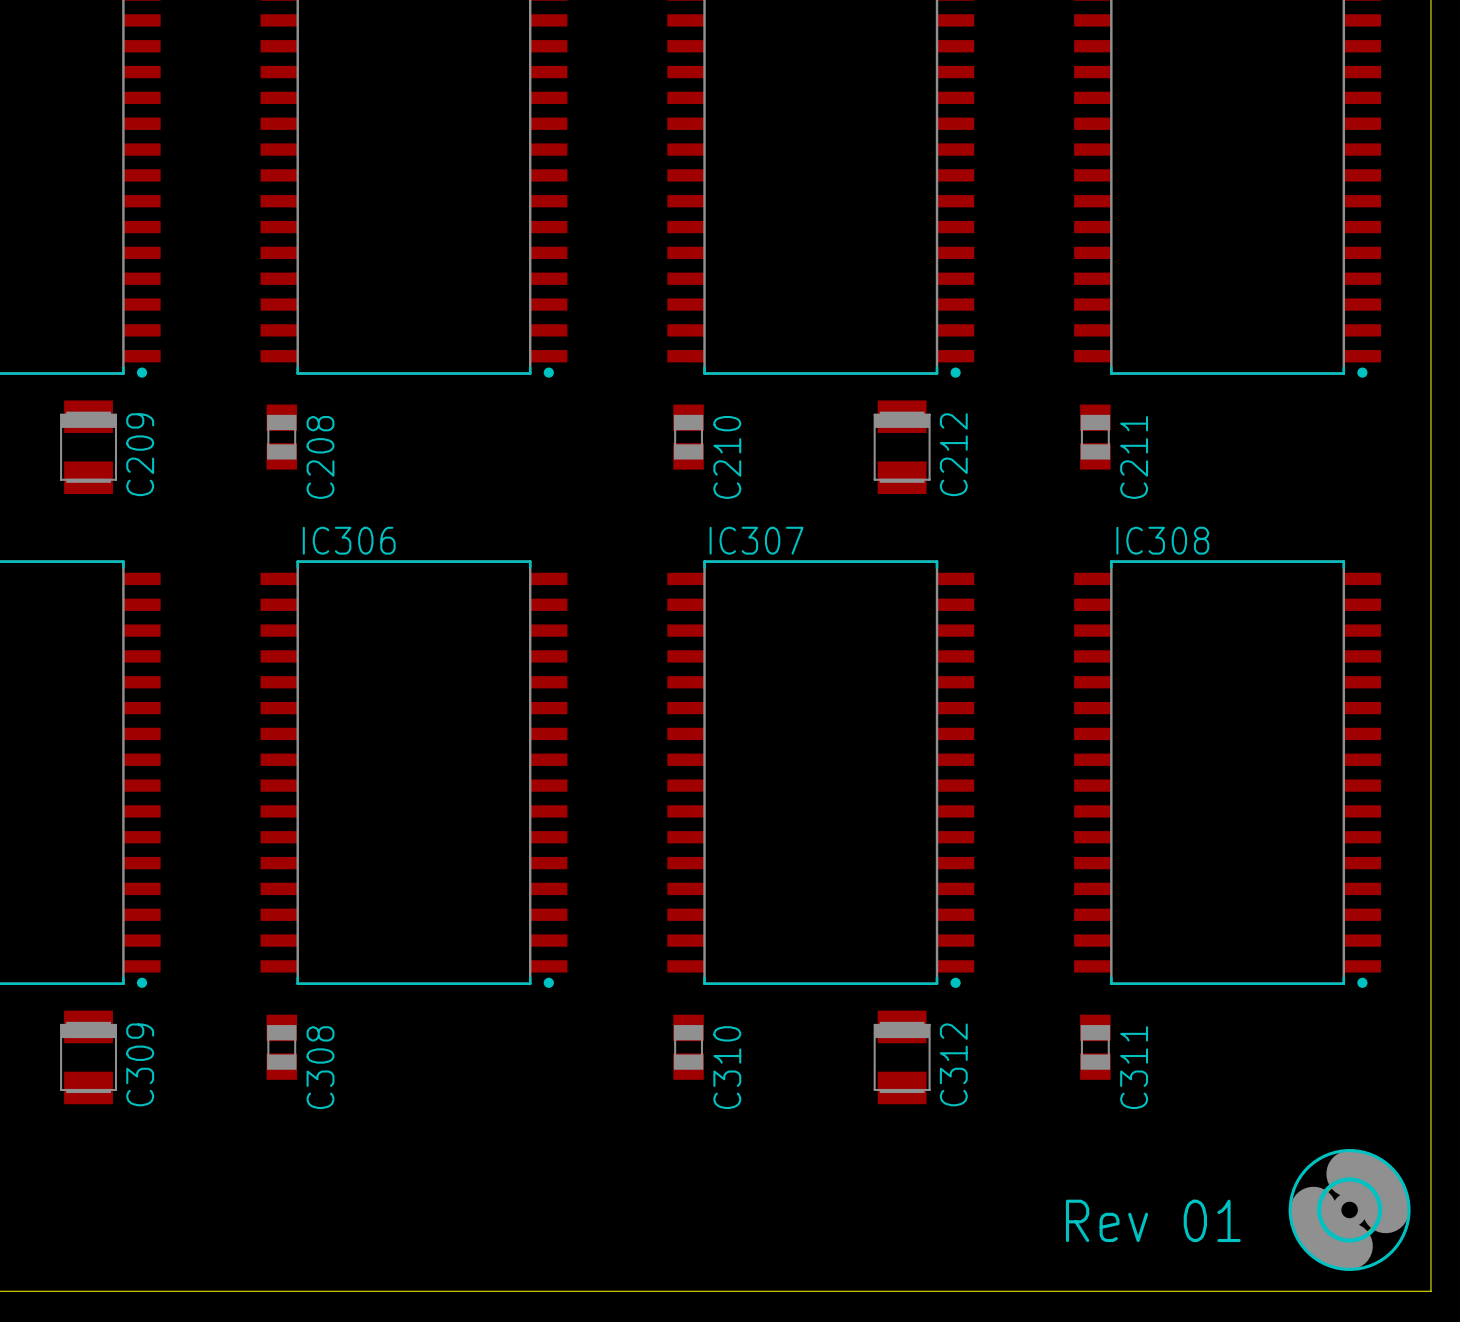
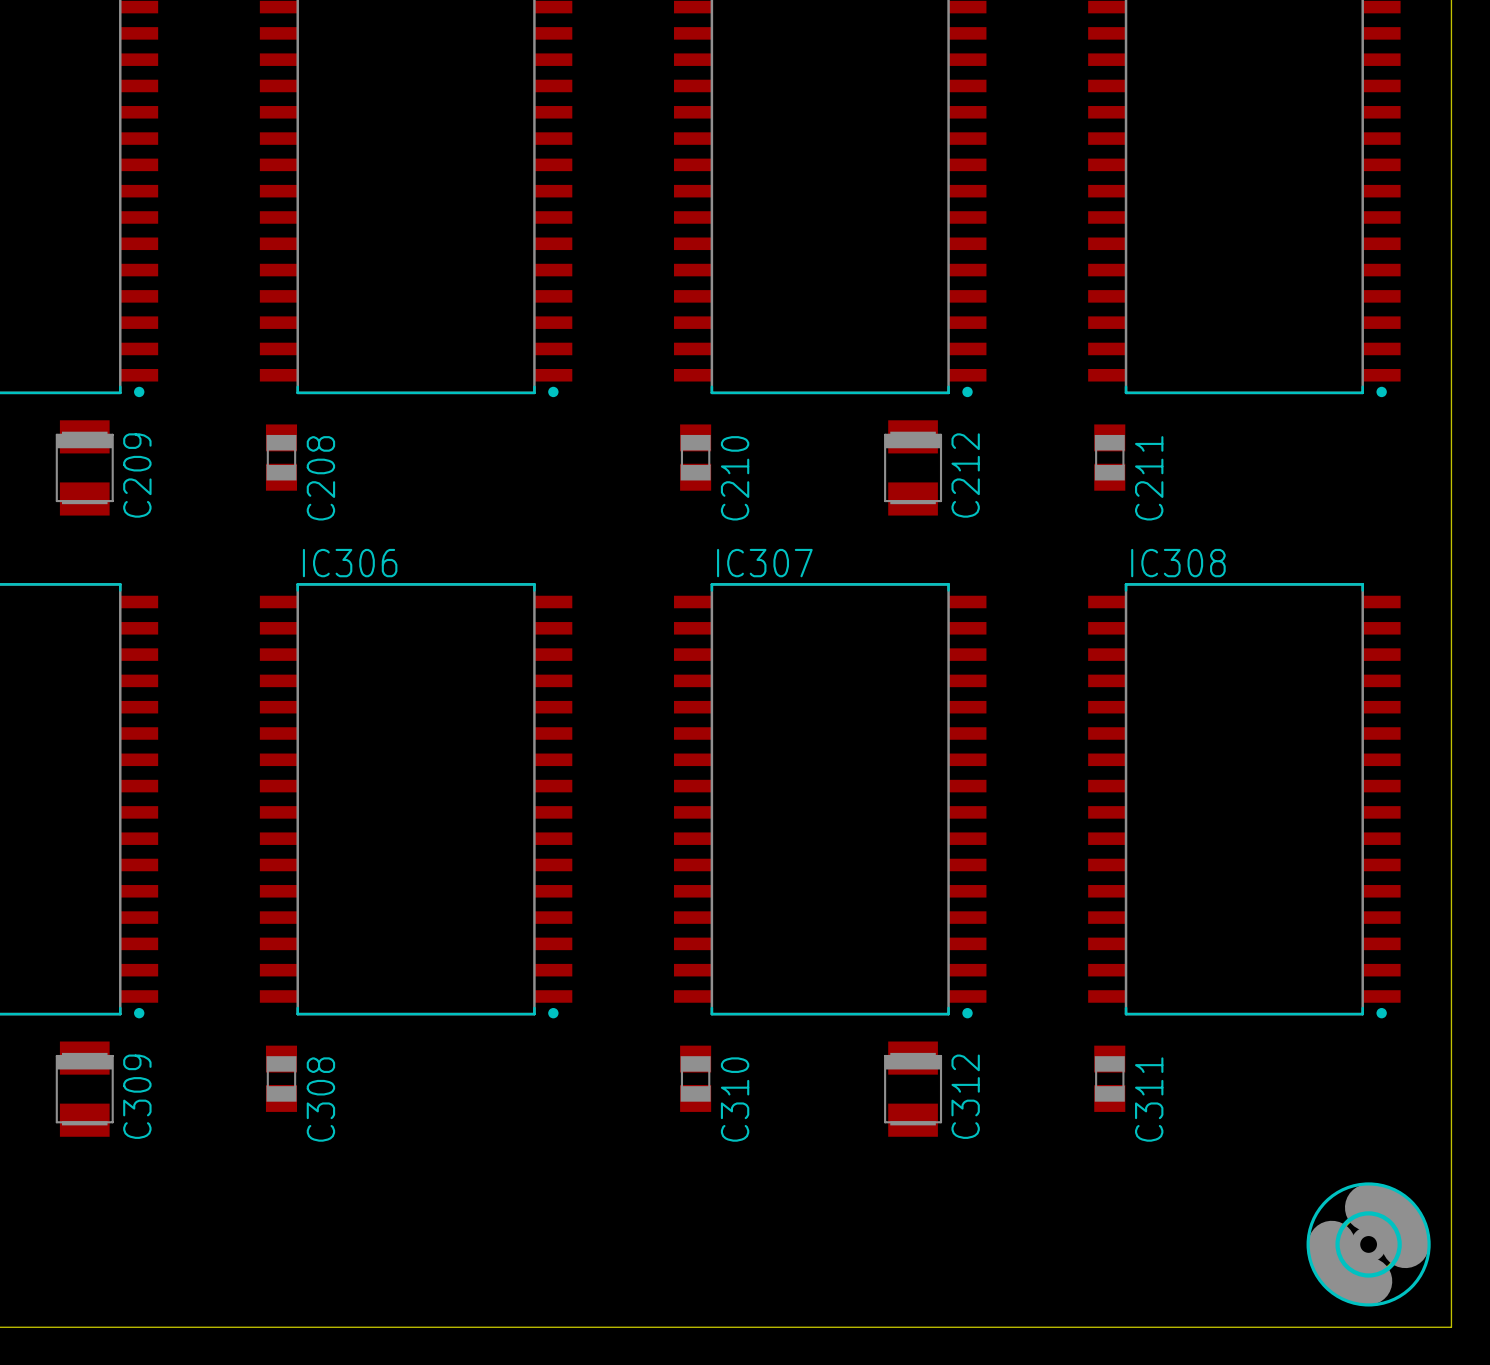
text: Rev 01 (1153, 1220) -> none

